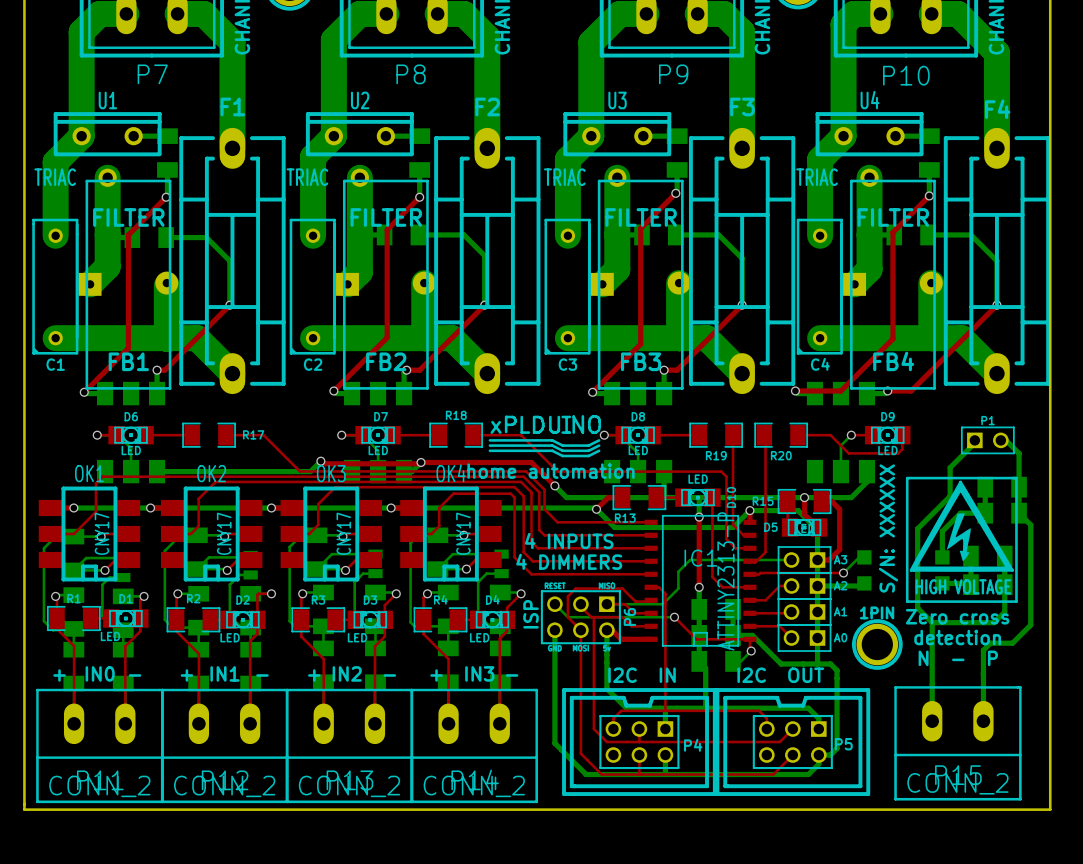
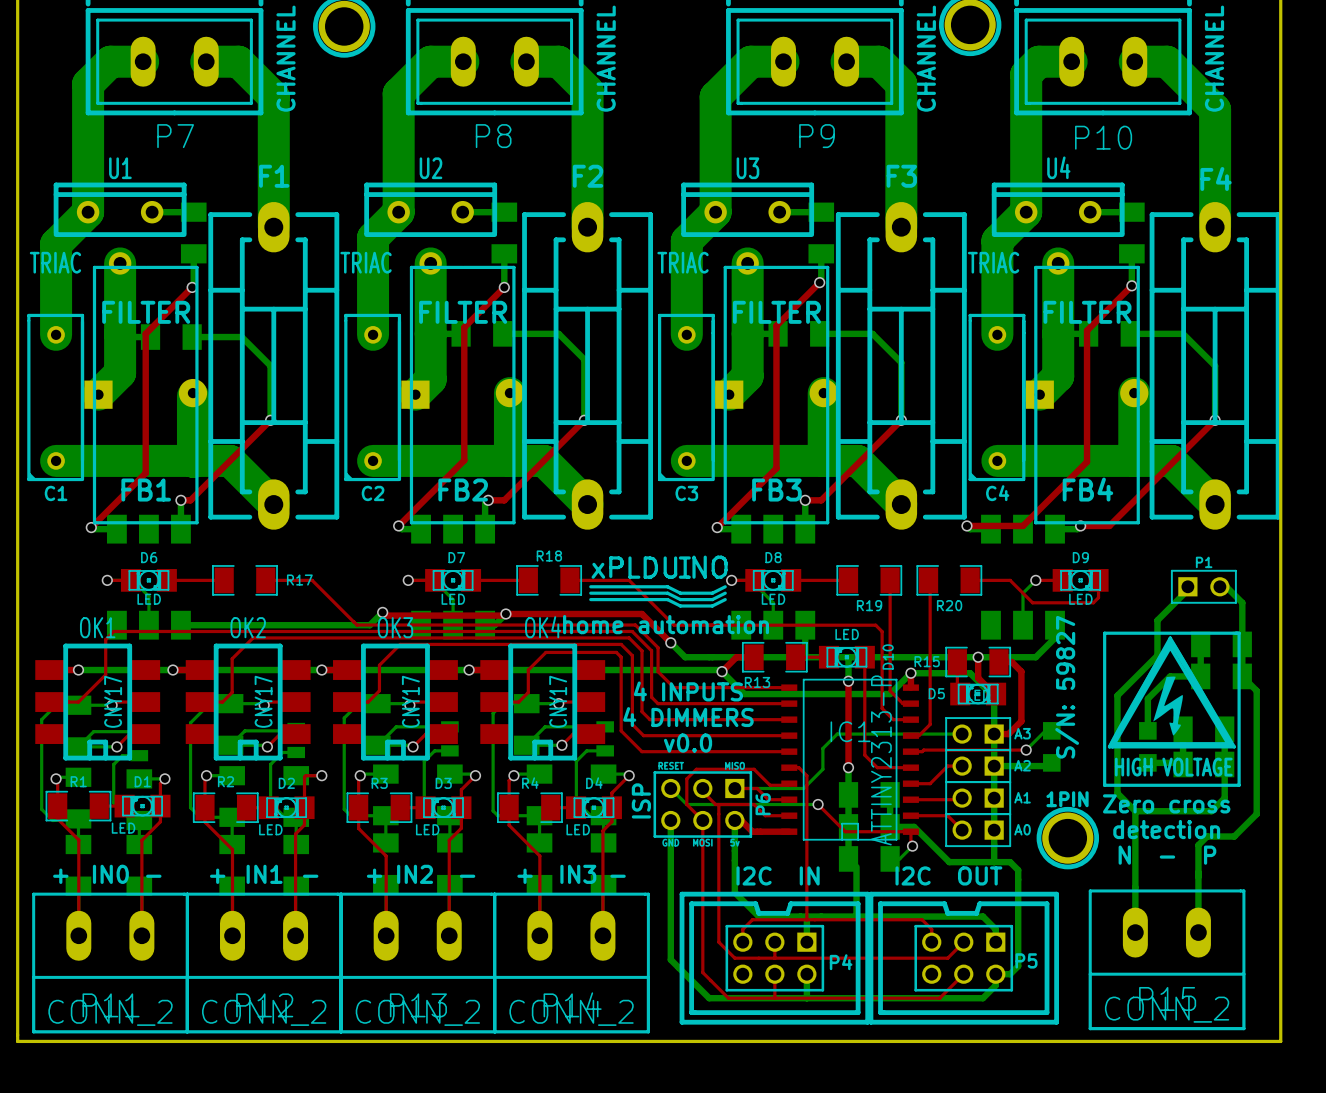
text: none -> S/N: 59827 (1067, 687)
text: S/N: XXXXXX (888, 528) -> none
text position: 4 INPUTS (569, 541) -> 4 INPUTS (688, 691)
text position: 4 DIMMERS (569, 561) -> 4 DIMMERS (688, 717)
text: none -> v0.0 (688, 743)

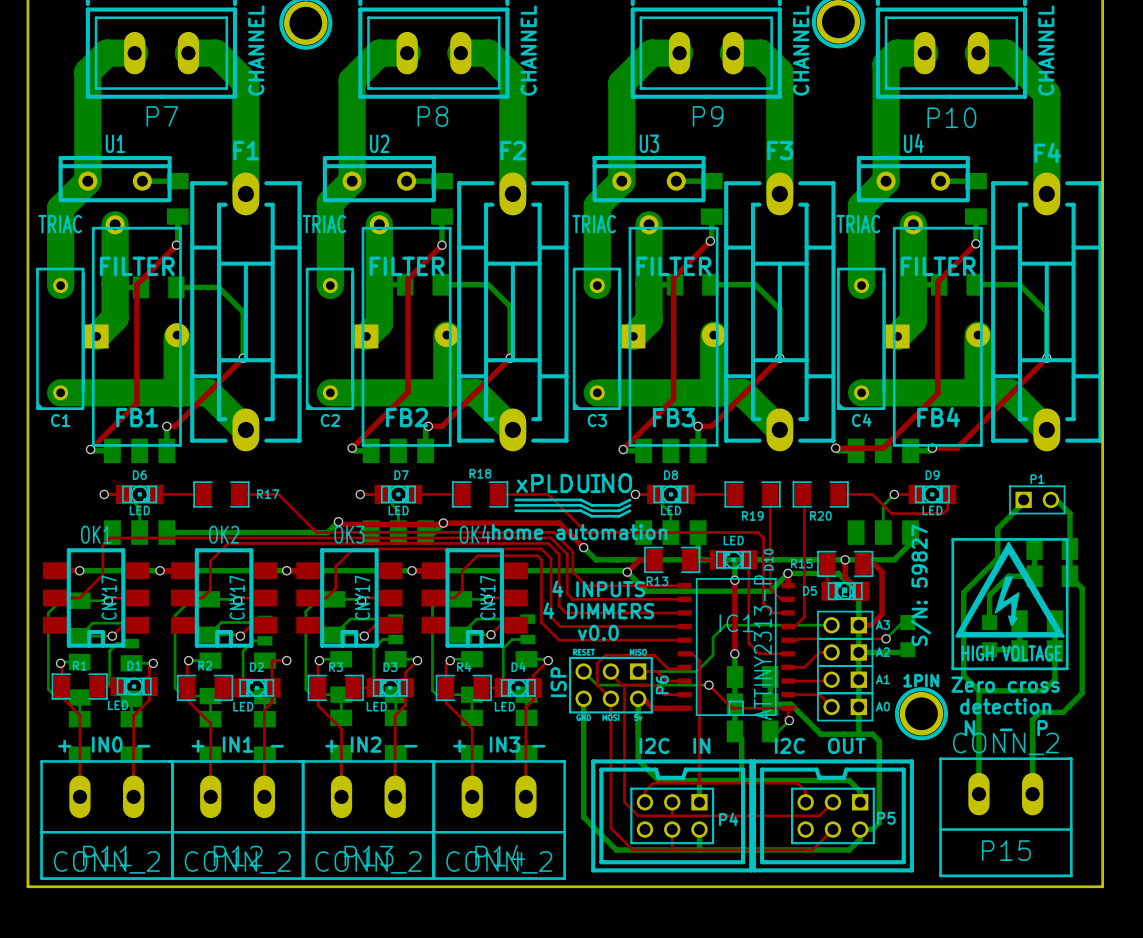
P15 value position: CONN_2 (1167, 1009) -> CONN_2 (1005, 743)

